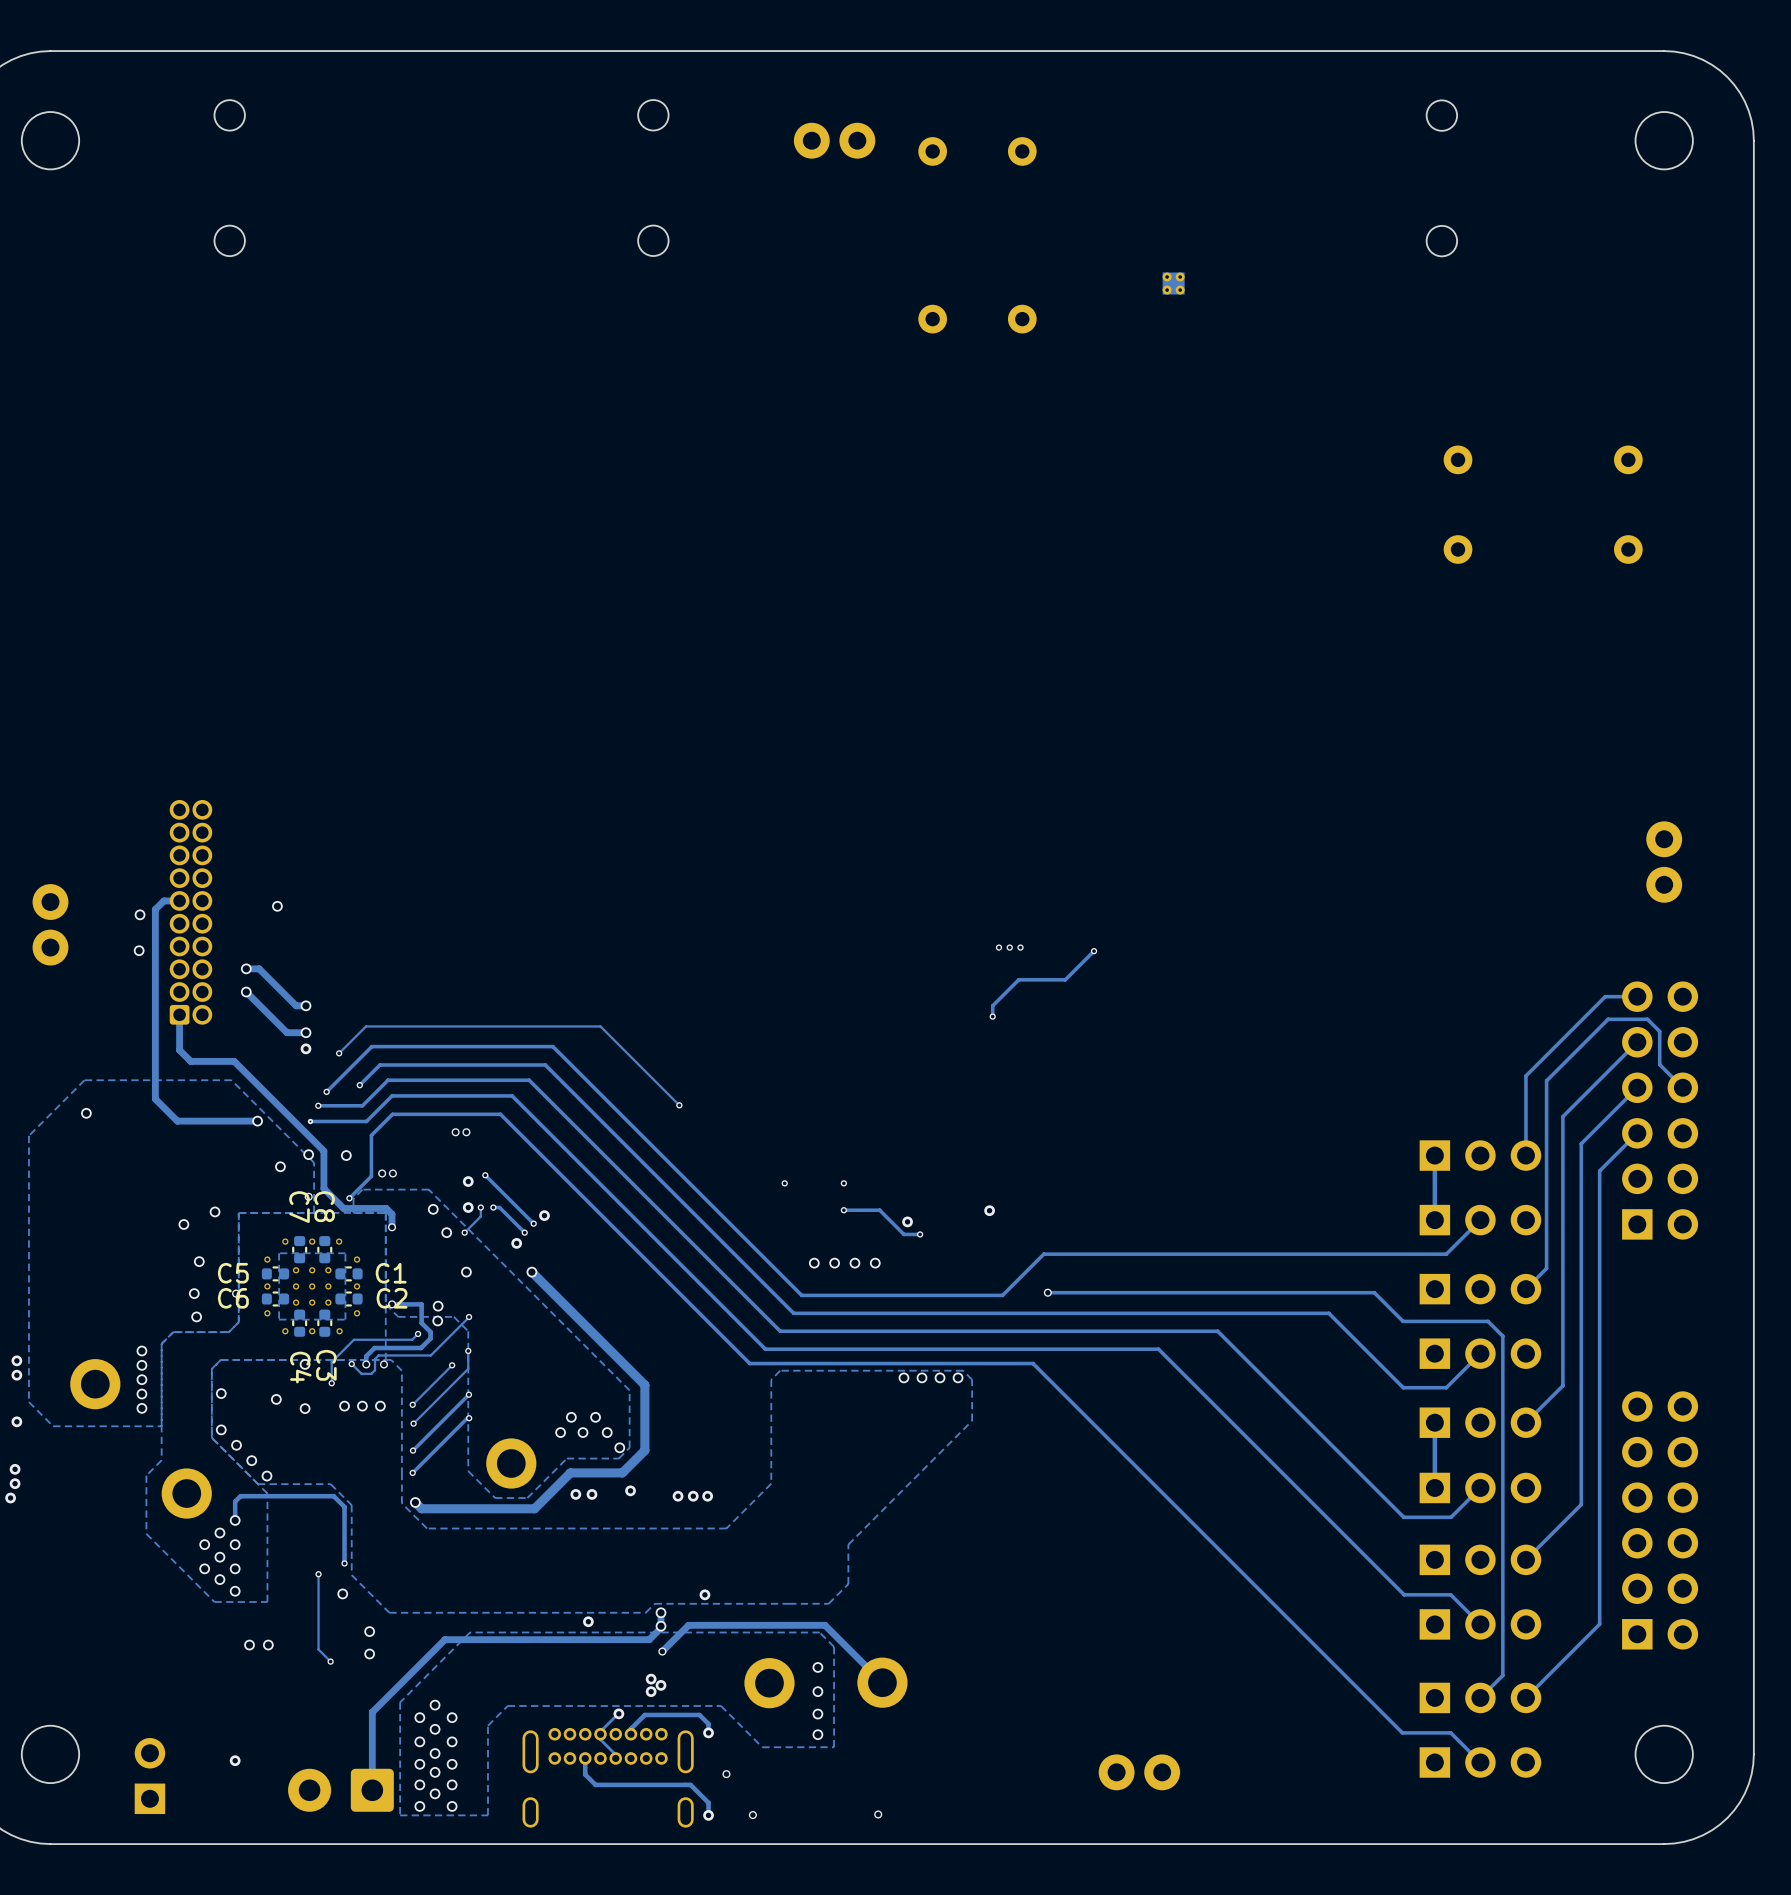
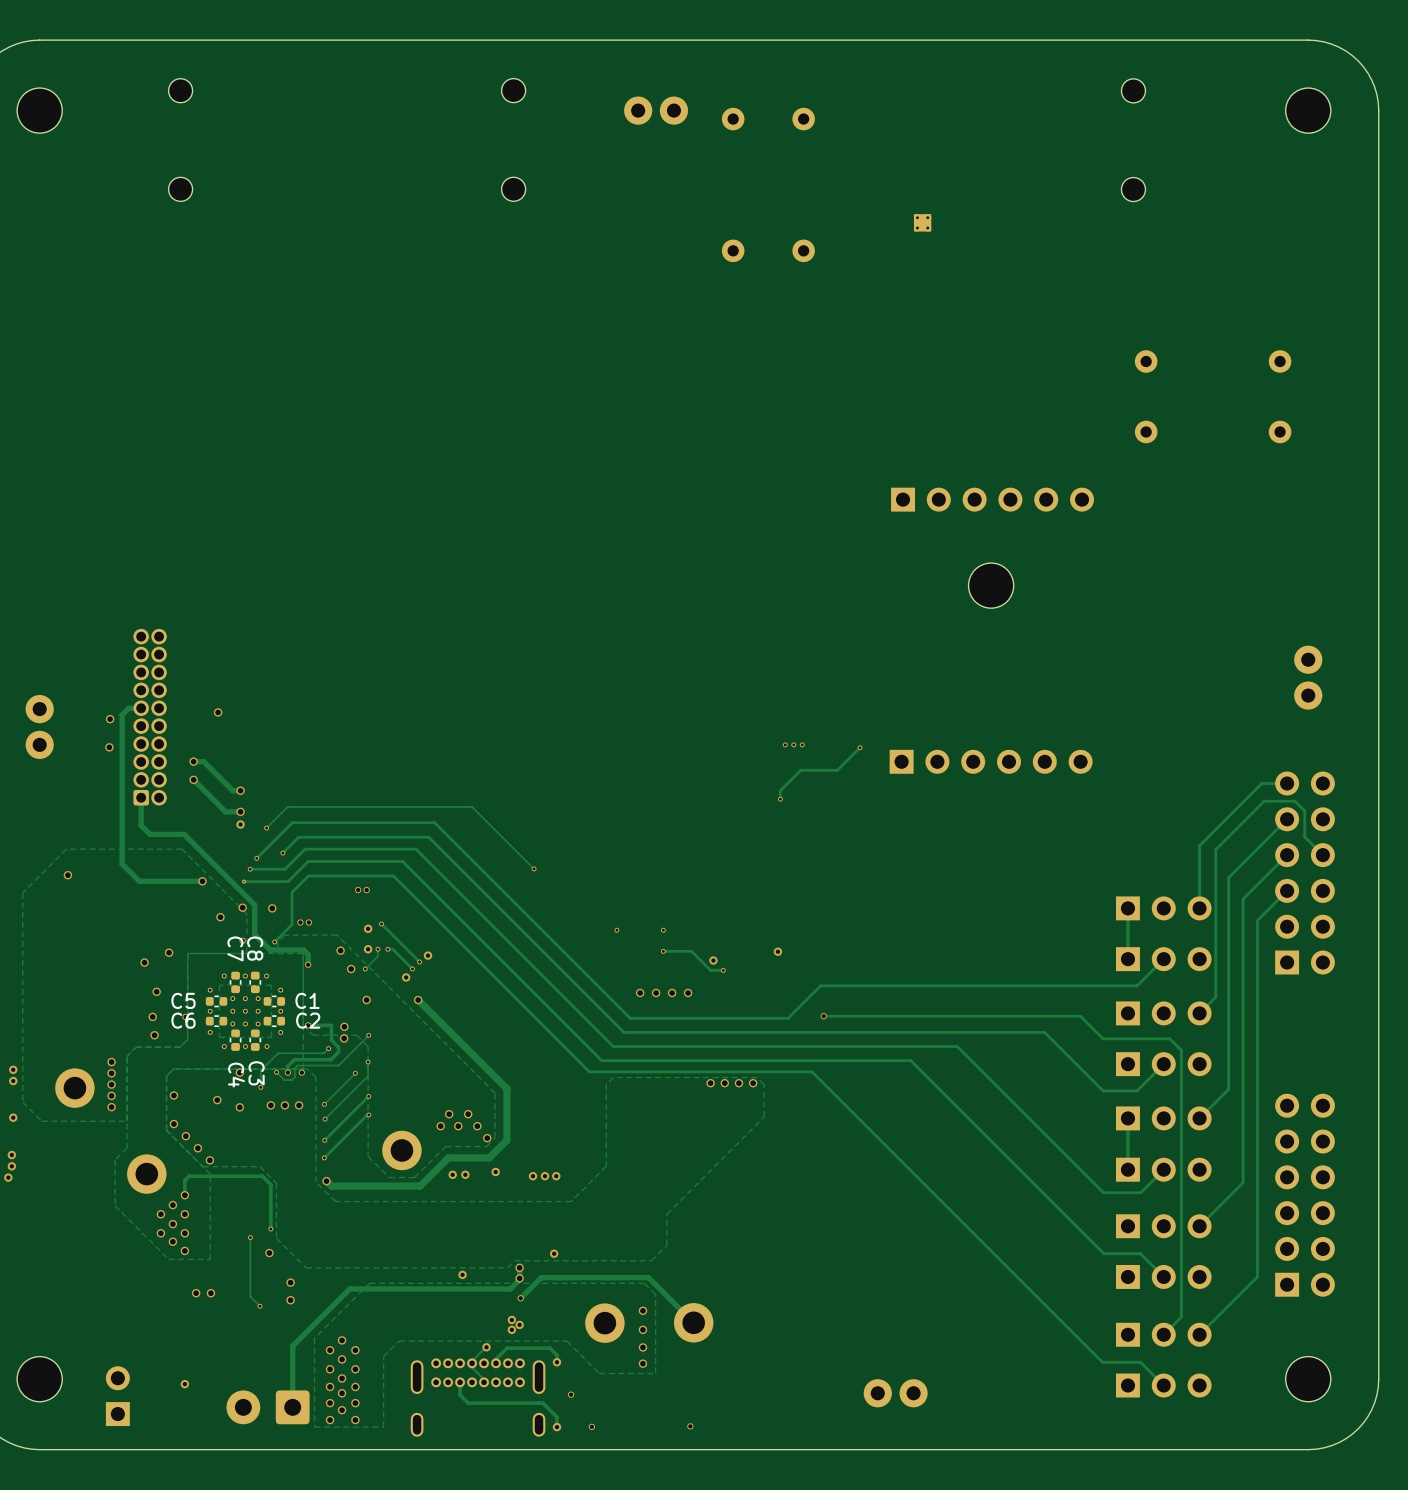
part: none -> (992, 499)
part: none -> (991, 585)
part: none -> (991, 761)

